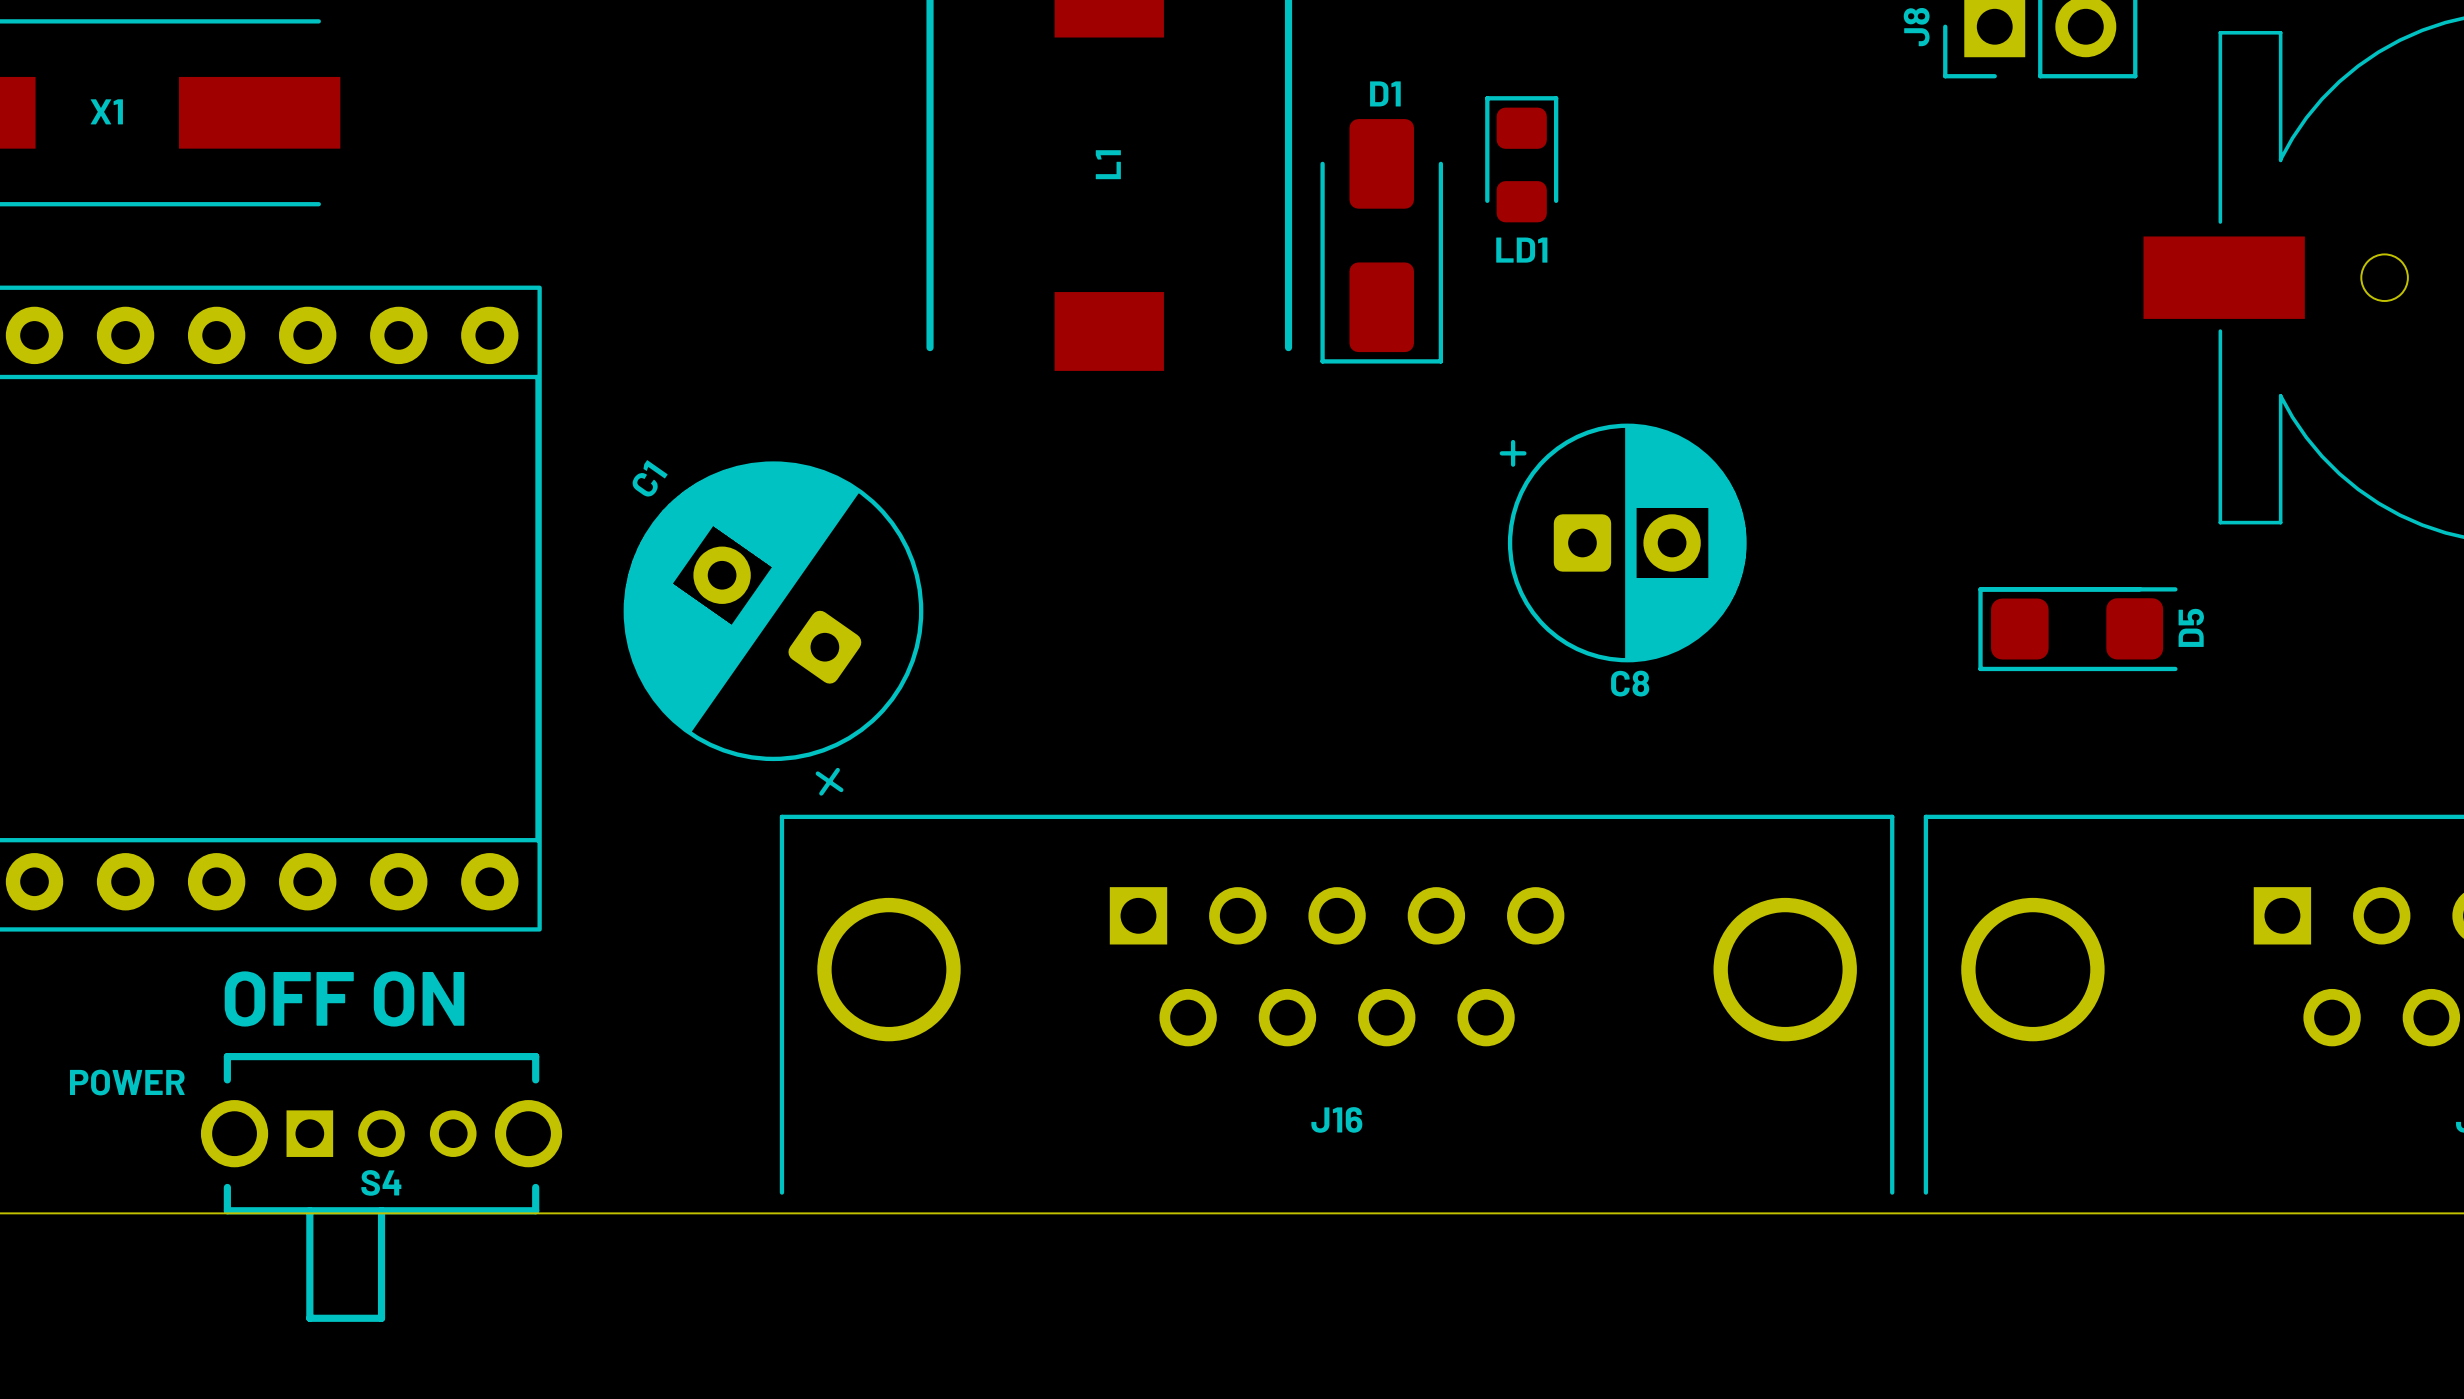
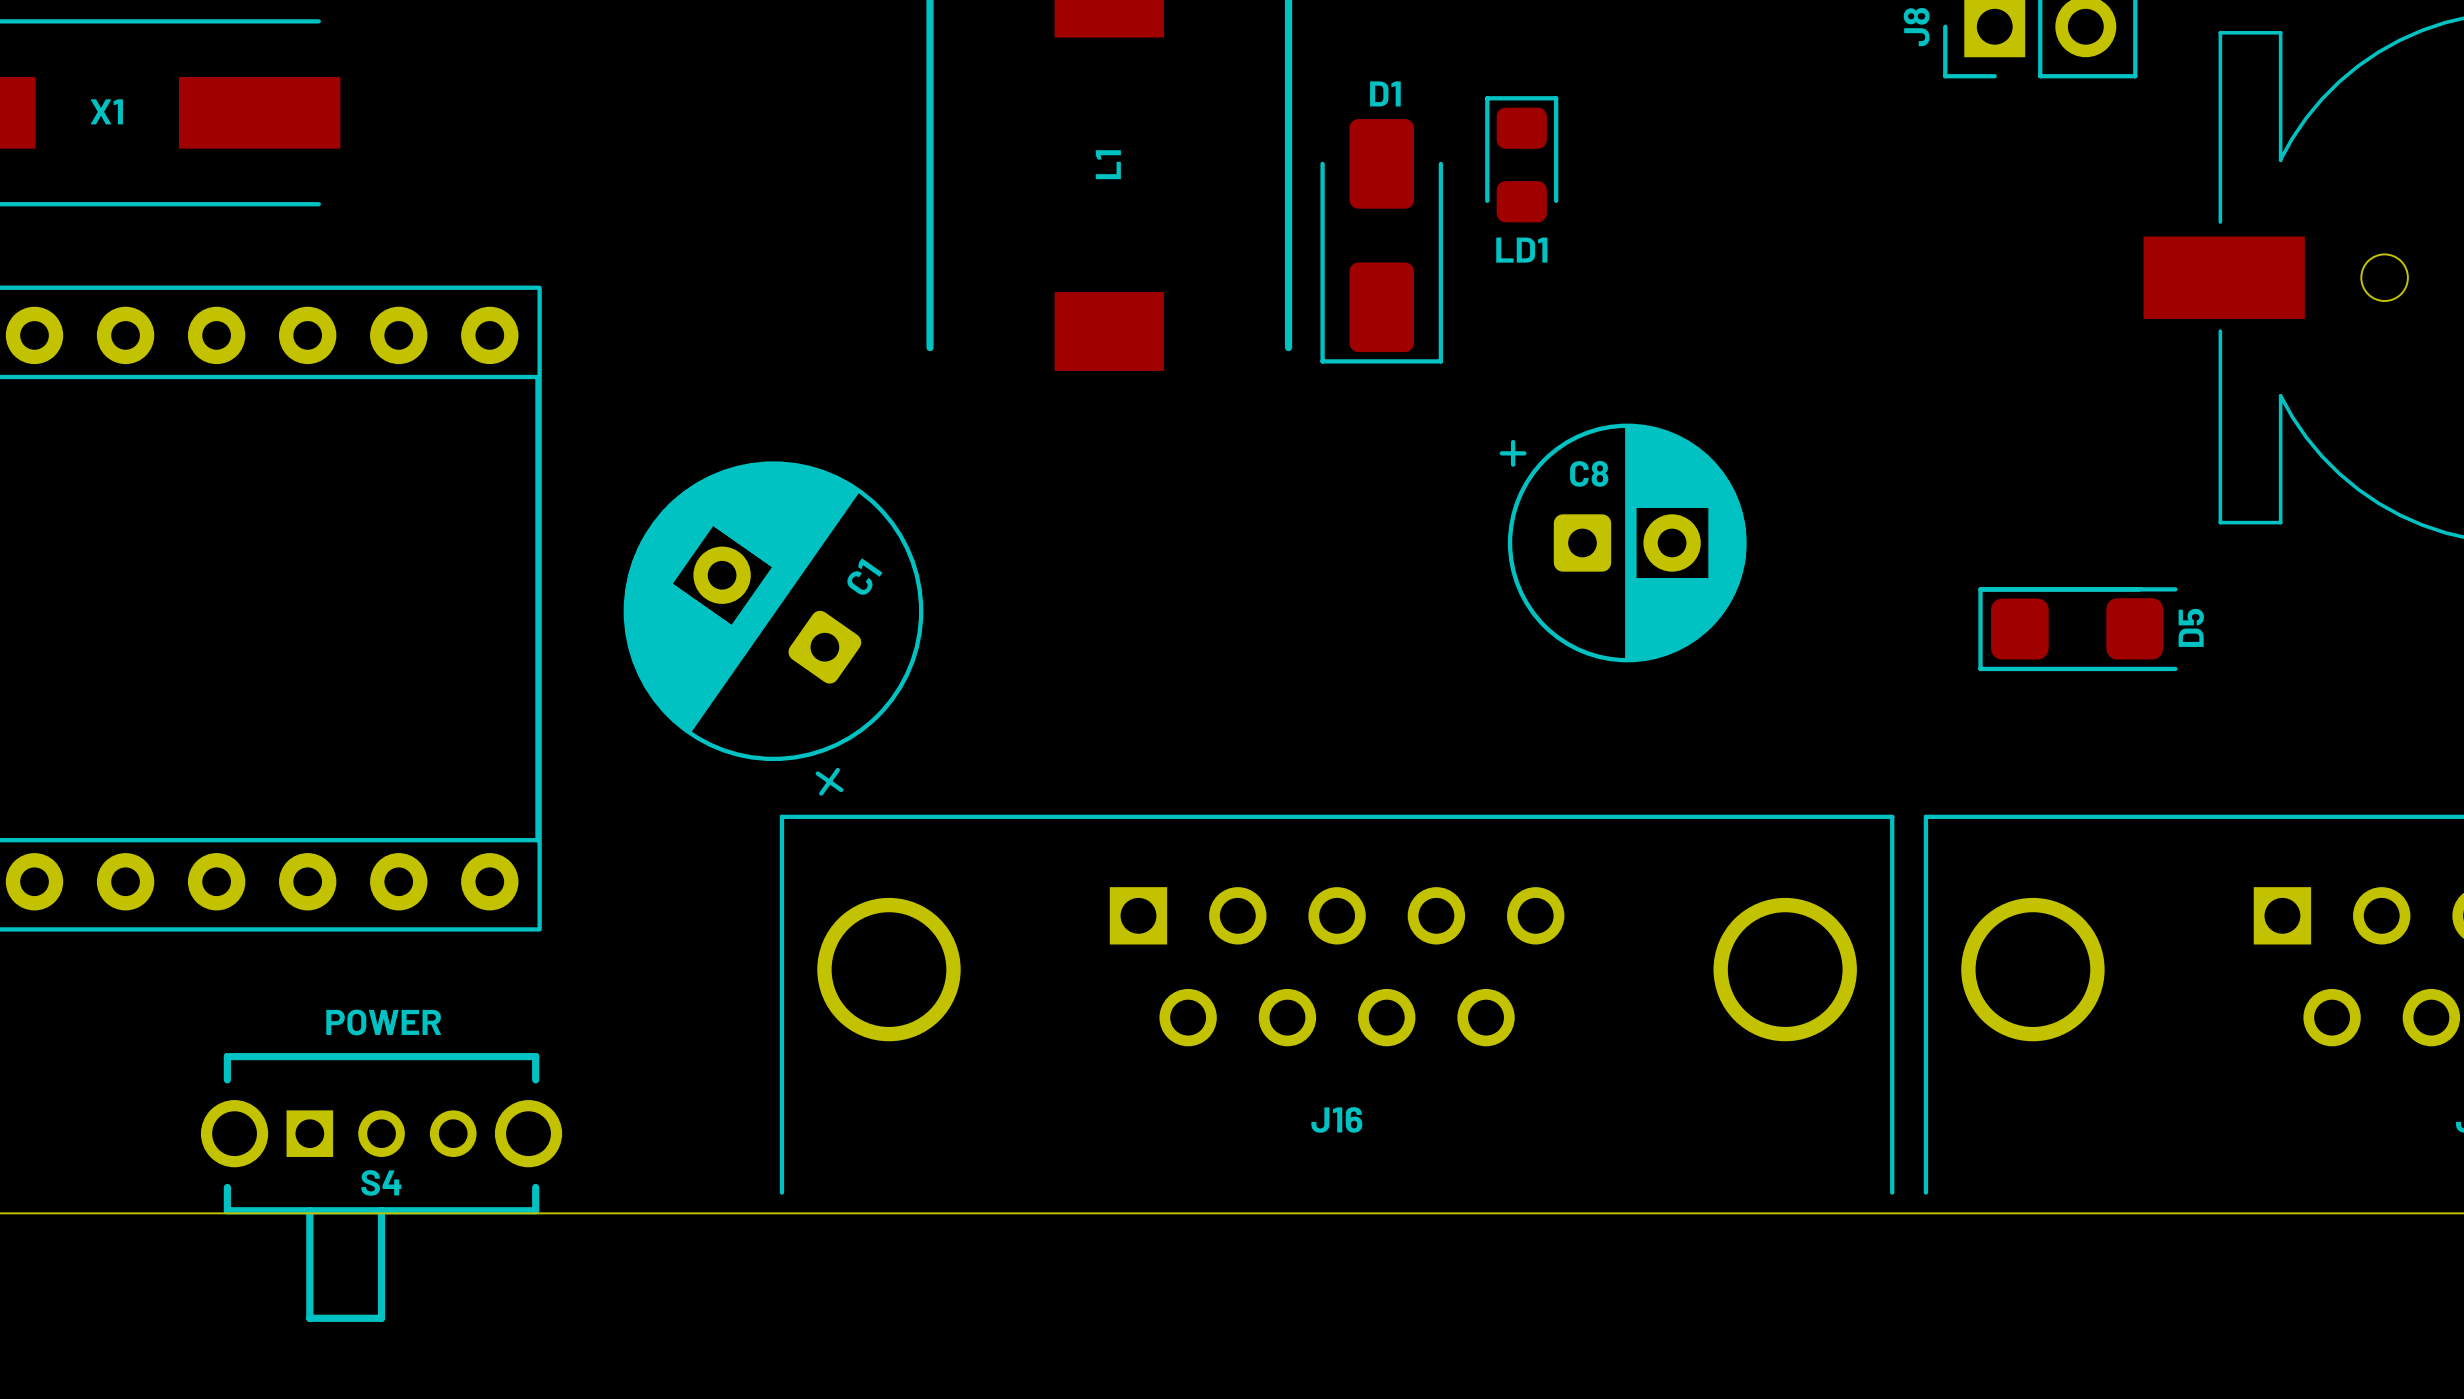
C1 name position: C1 (649, 478) -> C1 (864, 576)
C8 name position: C8 (1630, 683) -> C8 (1589, 473)
text: OFF ON (344, 998) -> none
text position: POWER (127, 1082) -> POWER (383, 1022)

